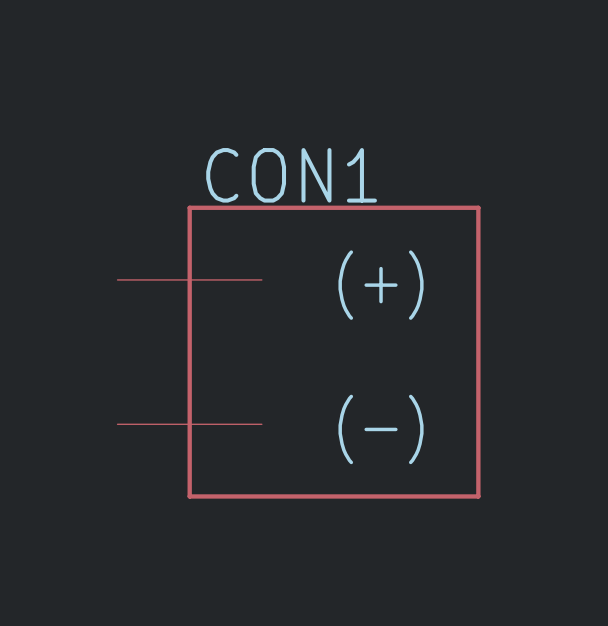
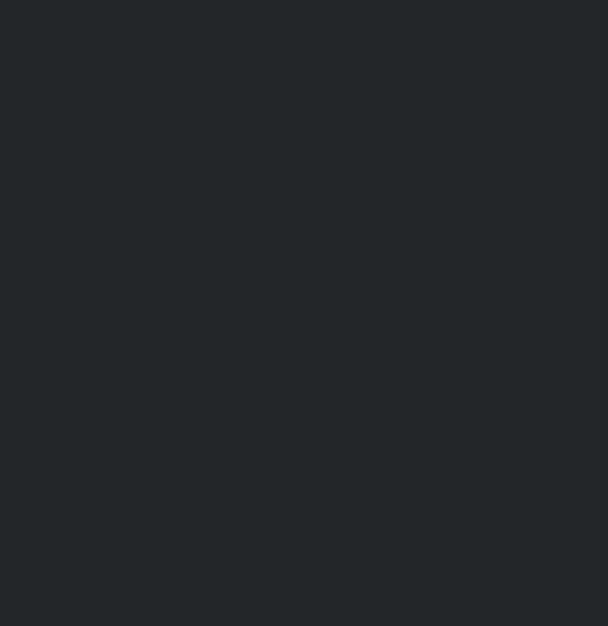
CON1: (299, 352) -> none

